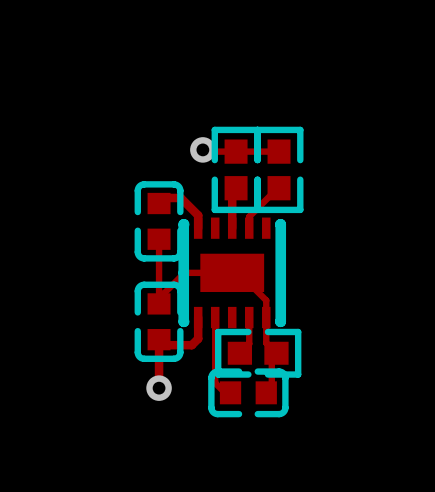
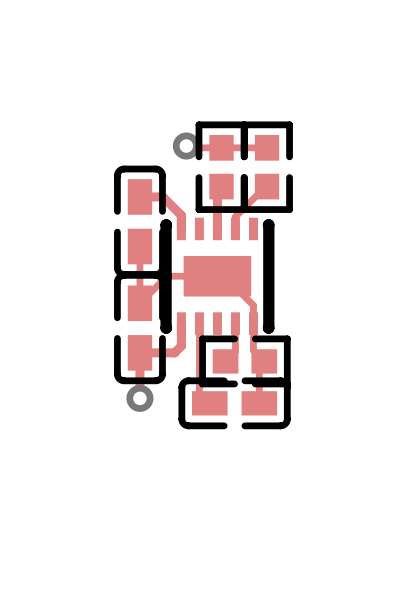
part footprint: [134, 181, 184, 262] -> [114, 165, 166, 278]
part footprint: [134, 281, 184, 362] -> [114, 271, 166, 385]
part footprint: [208, 368, 289, 418] -> [178, 377, 291, 430]

